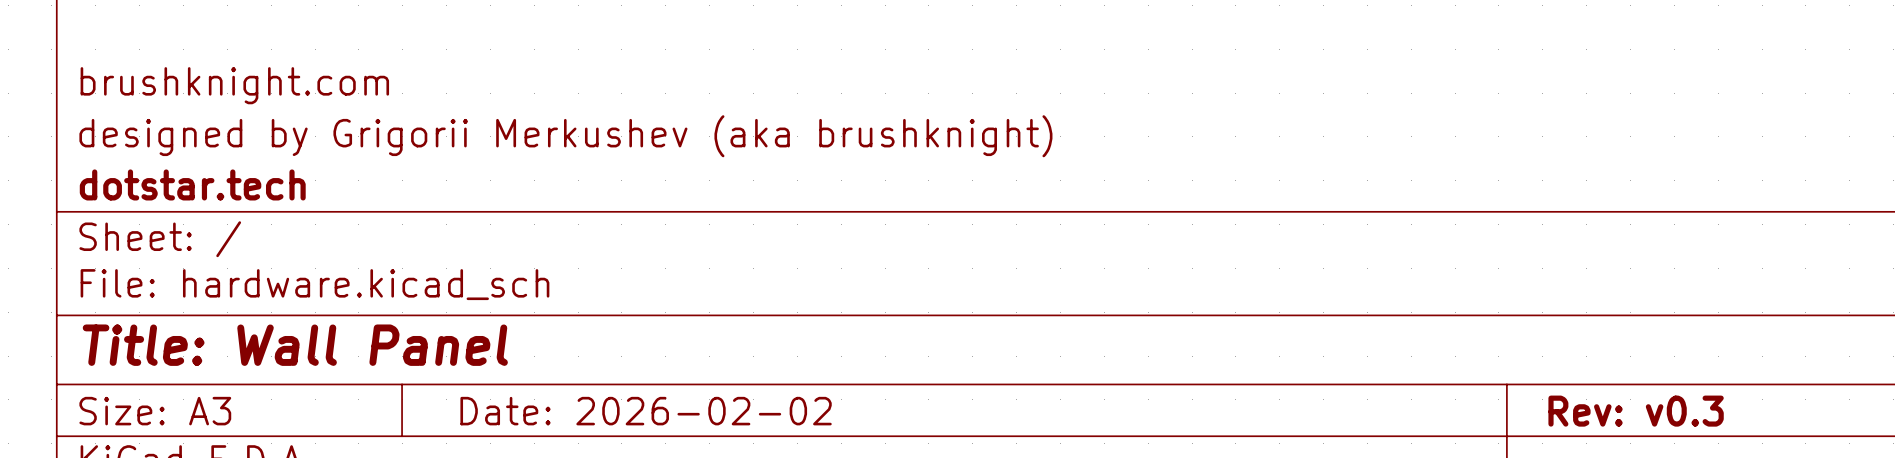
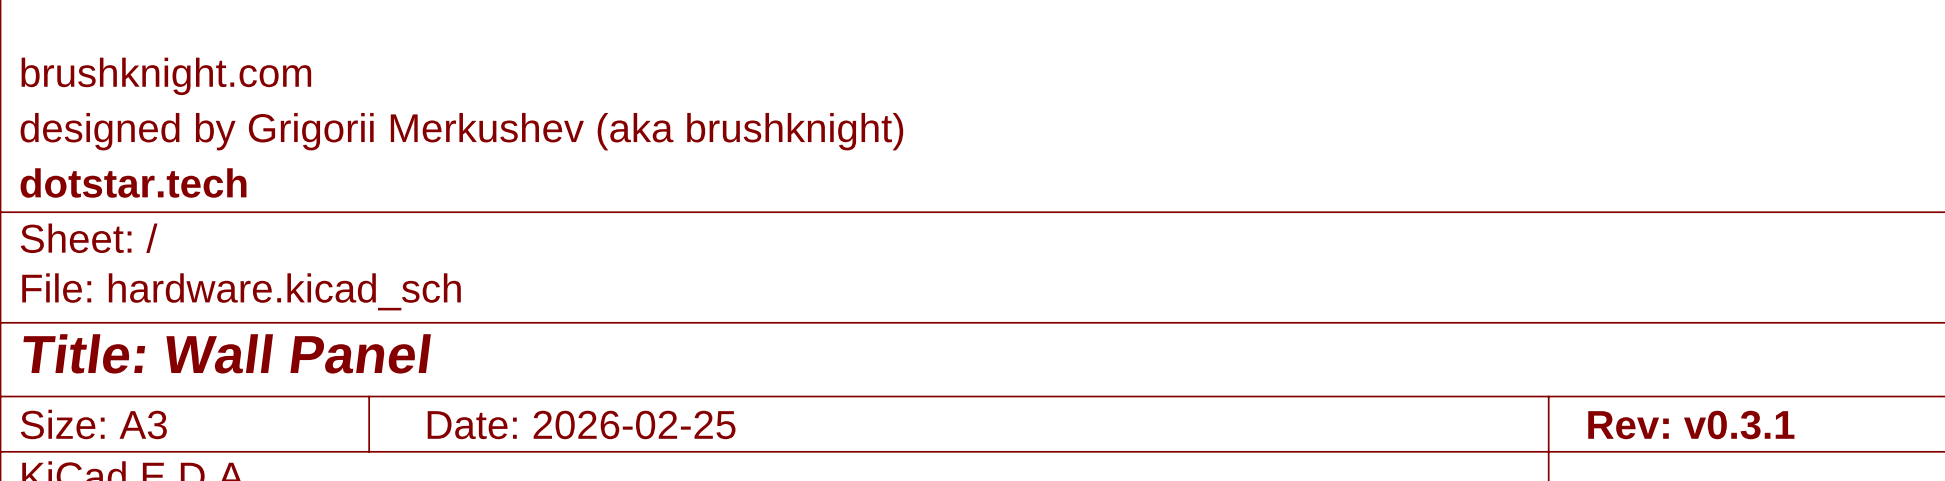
title block: Date: 2026-02-02 (646, 411) -> Date: 2026-02-25 (581, 424)
title block: Rev: v0.3 (1636, 411) -> Rev: v0.3.1 (1691, 424)

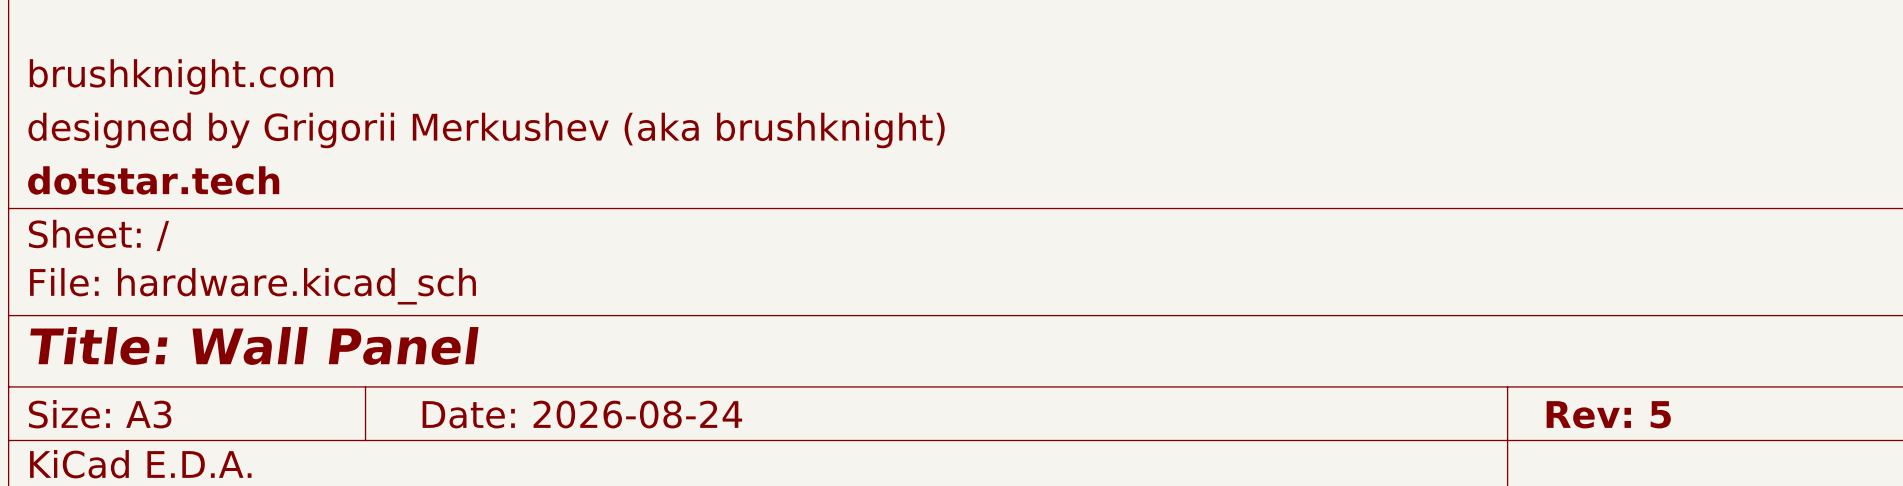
title block: Date: 2026-02-25 (581, 424) -> Date: 2026-08-24 (582, 414)
title block: Rev: v0.3.1 (1691, 424) -> Rev: 5 (1608, 414)

